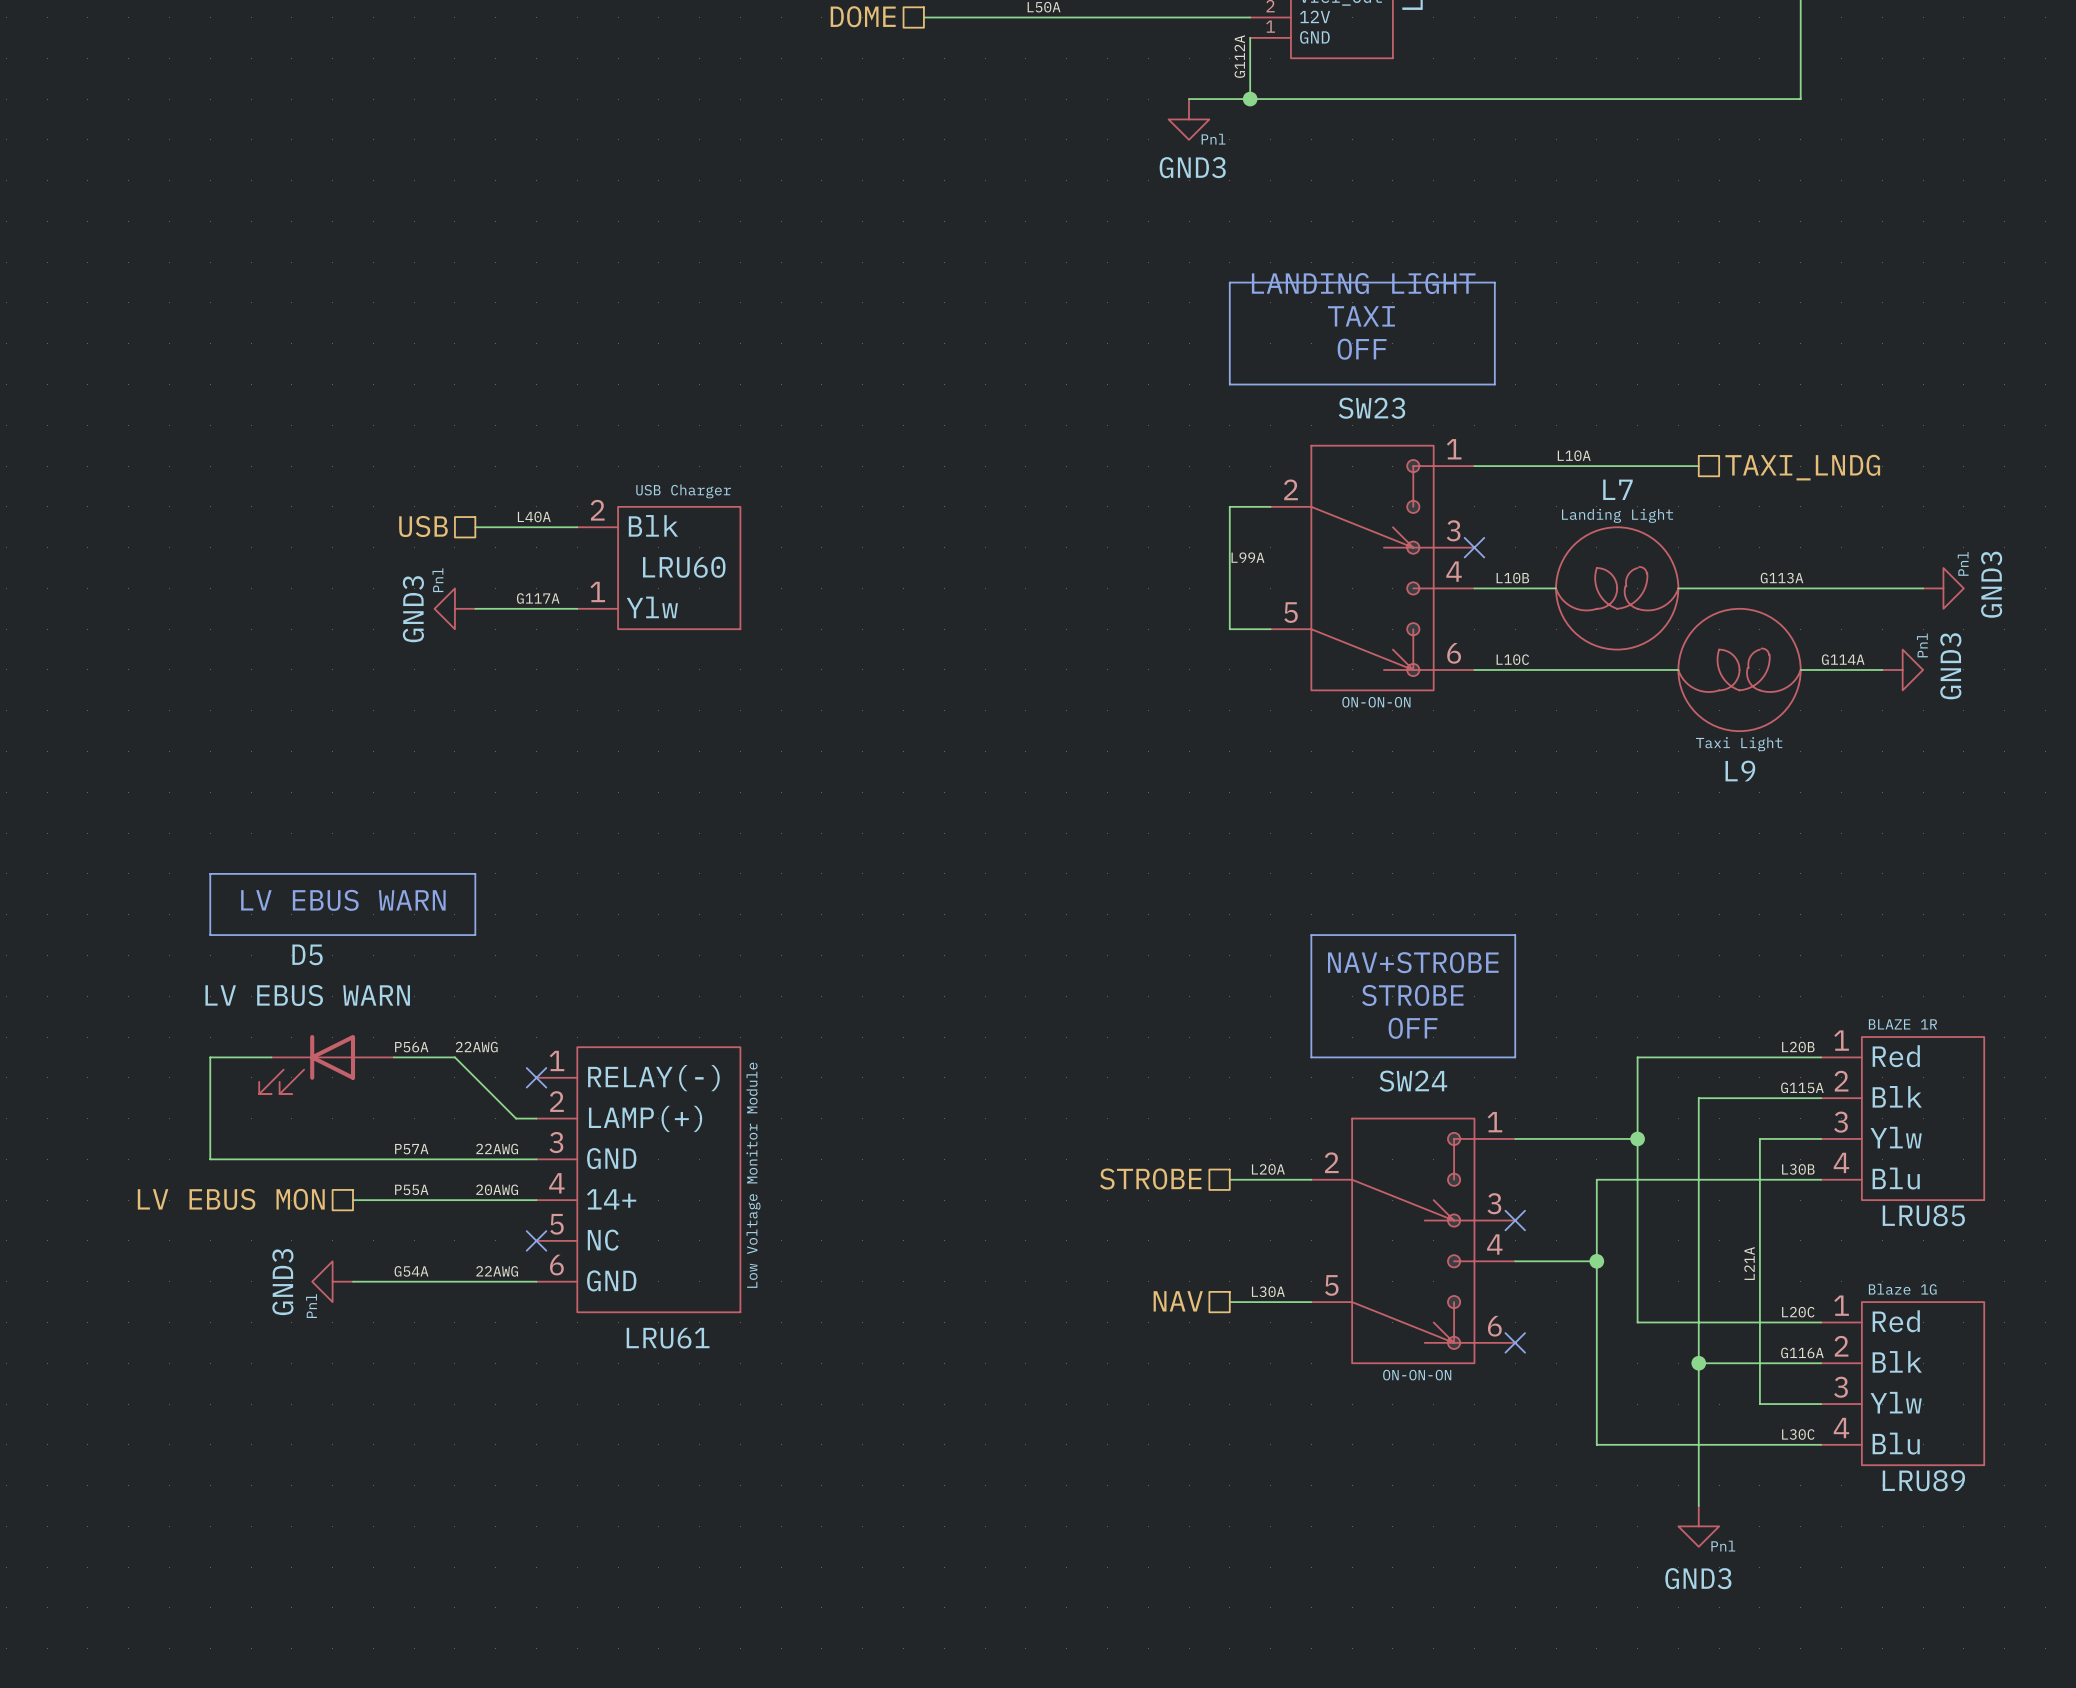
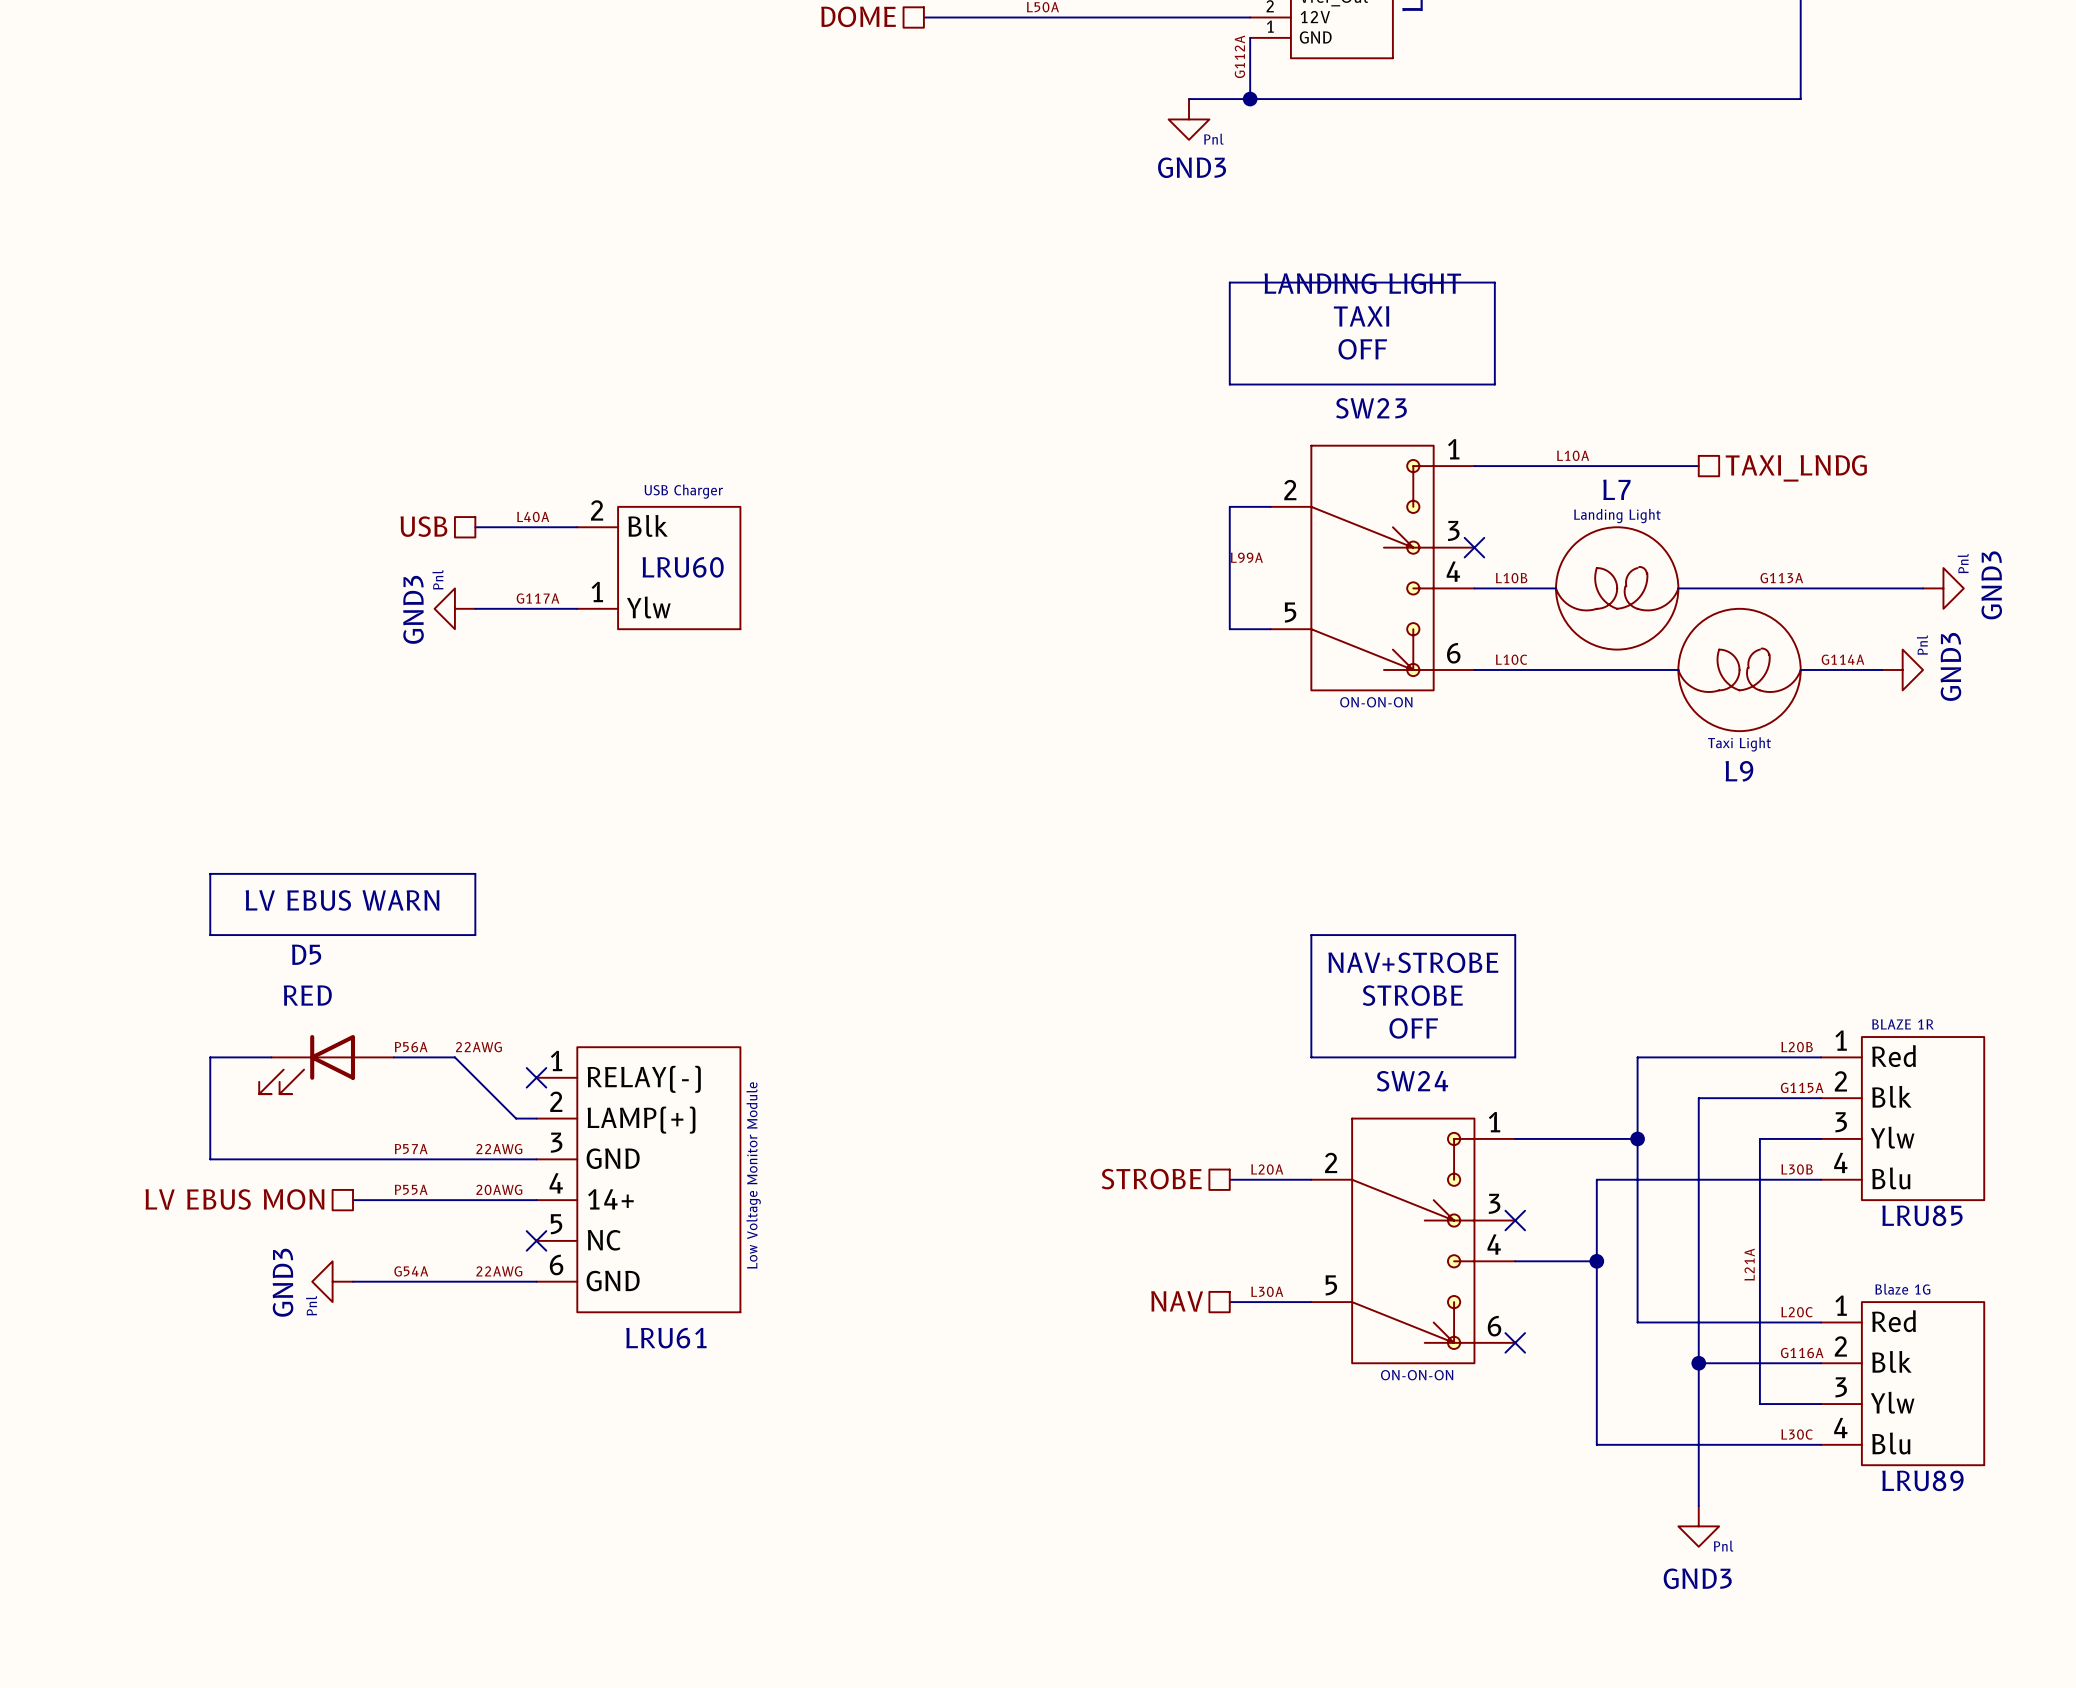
D5 value: LV EBUS WARN (307, 995) -> RED (307, 995)

